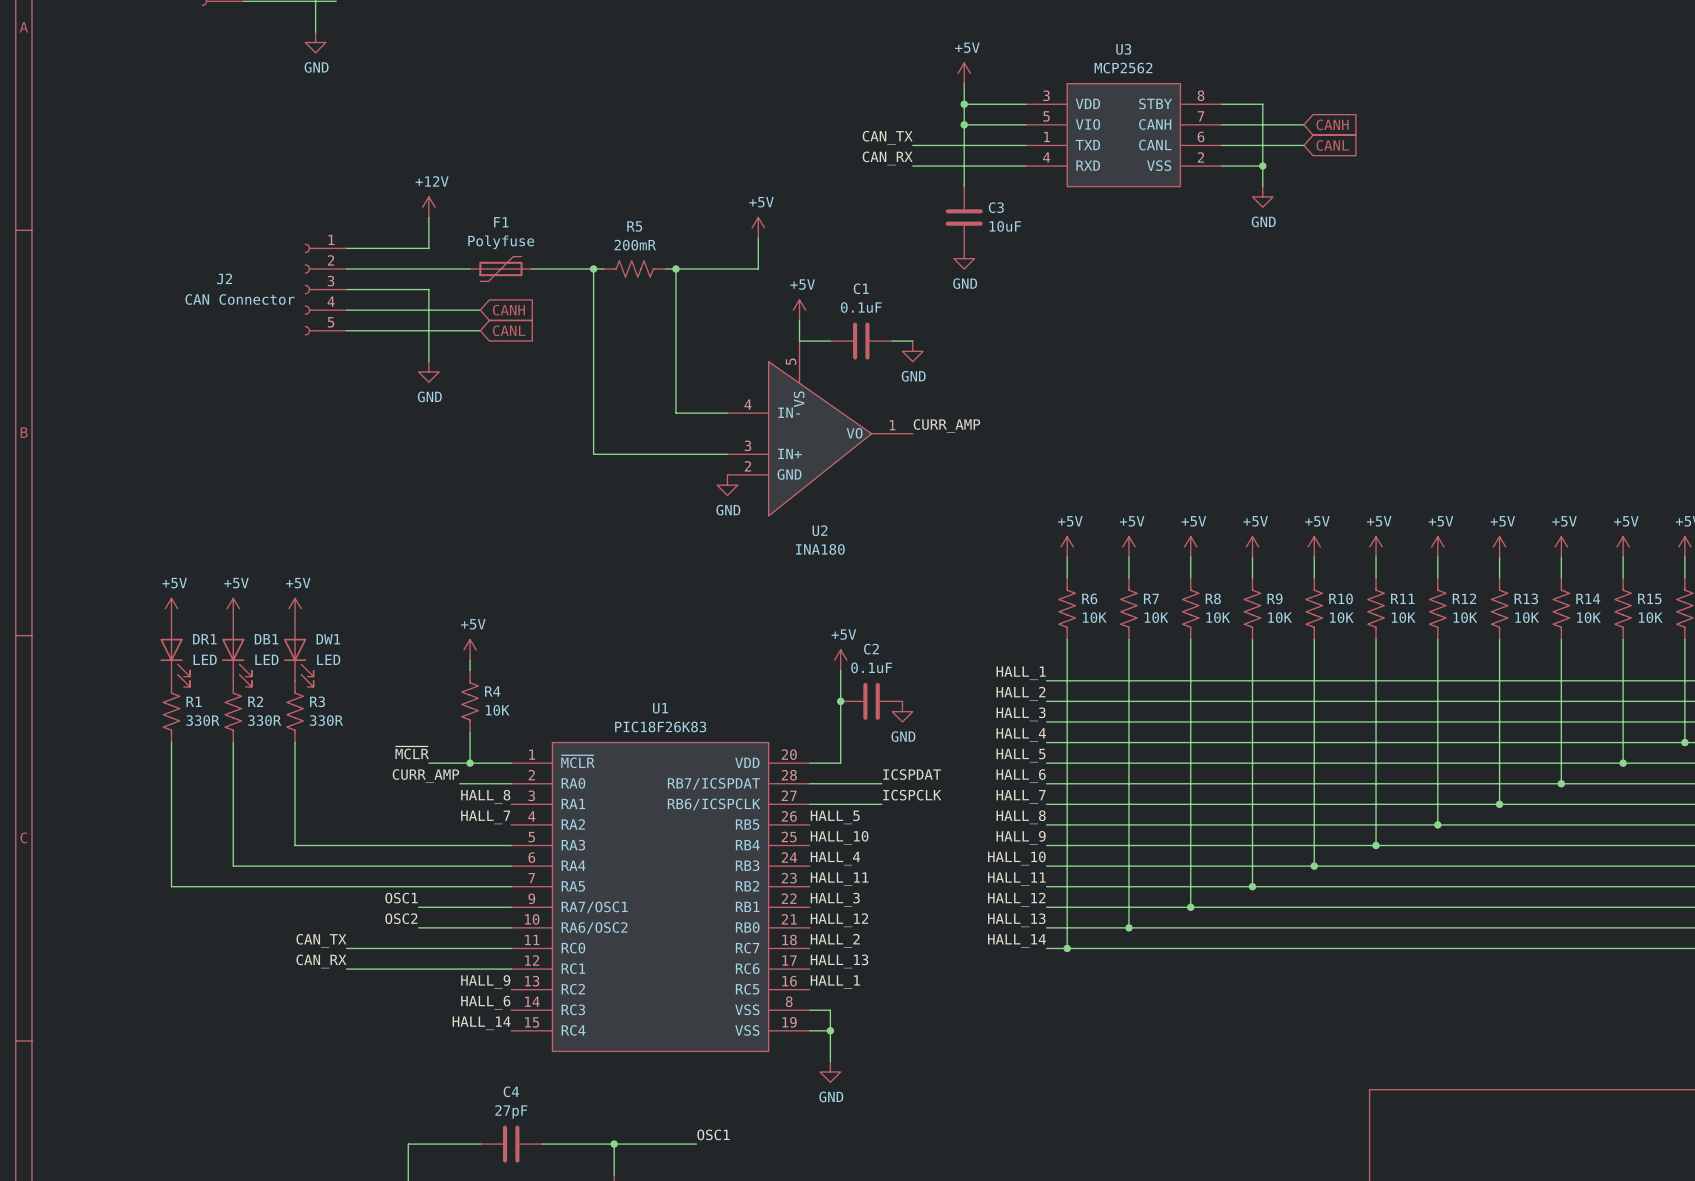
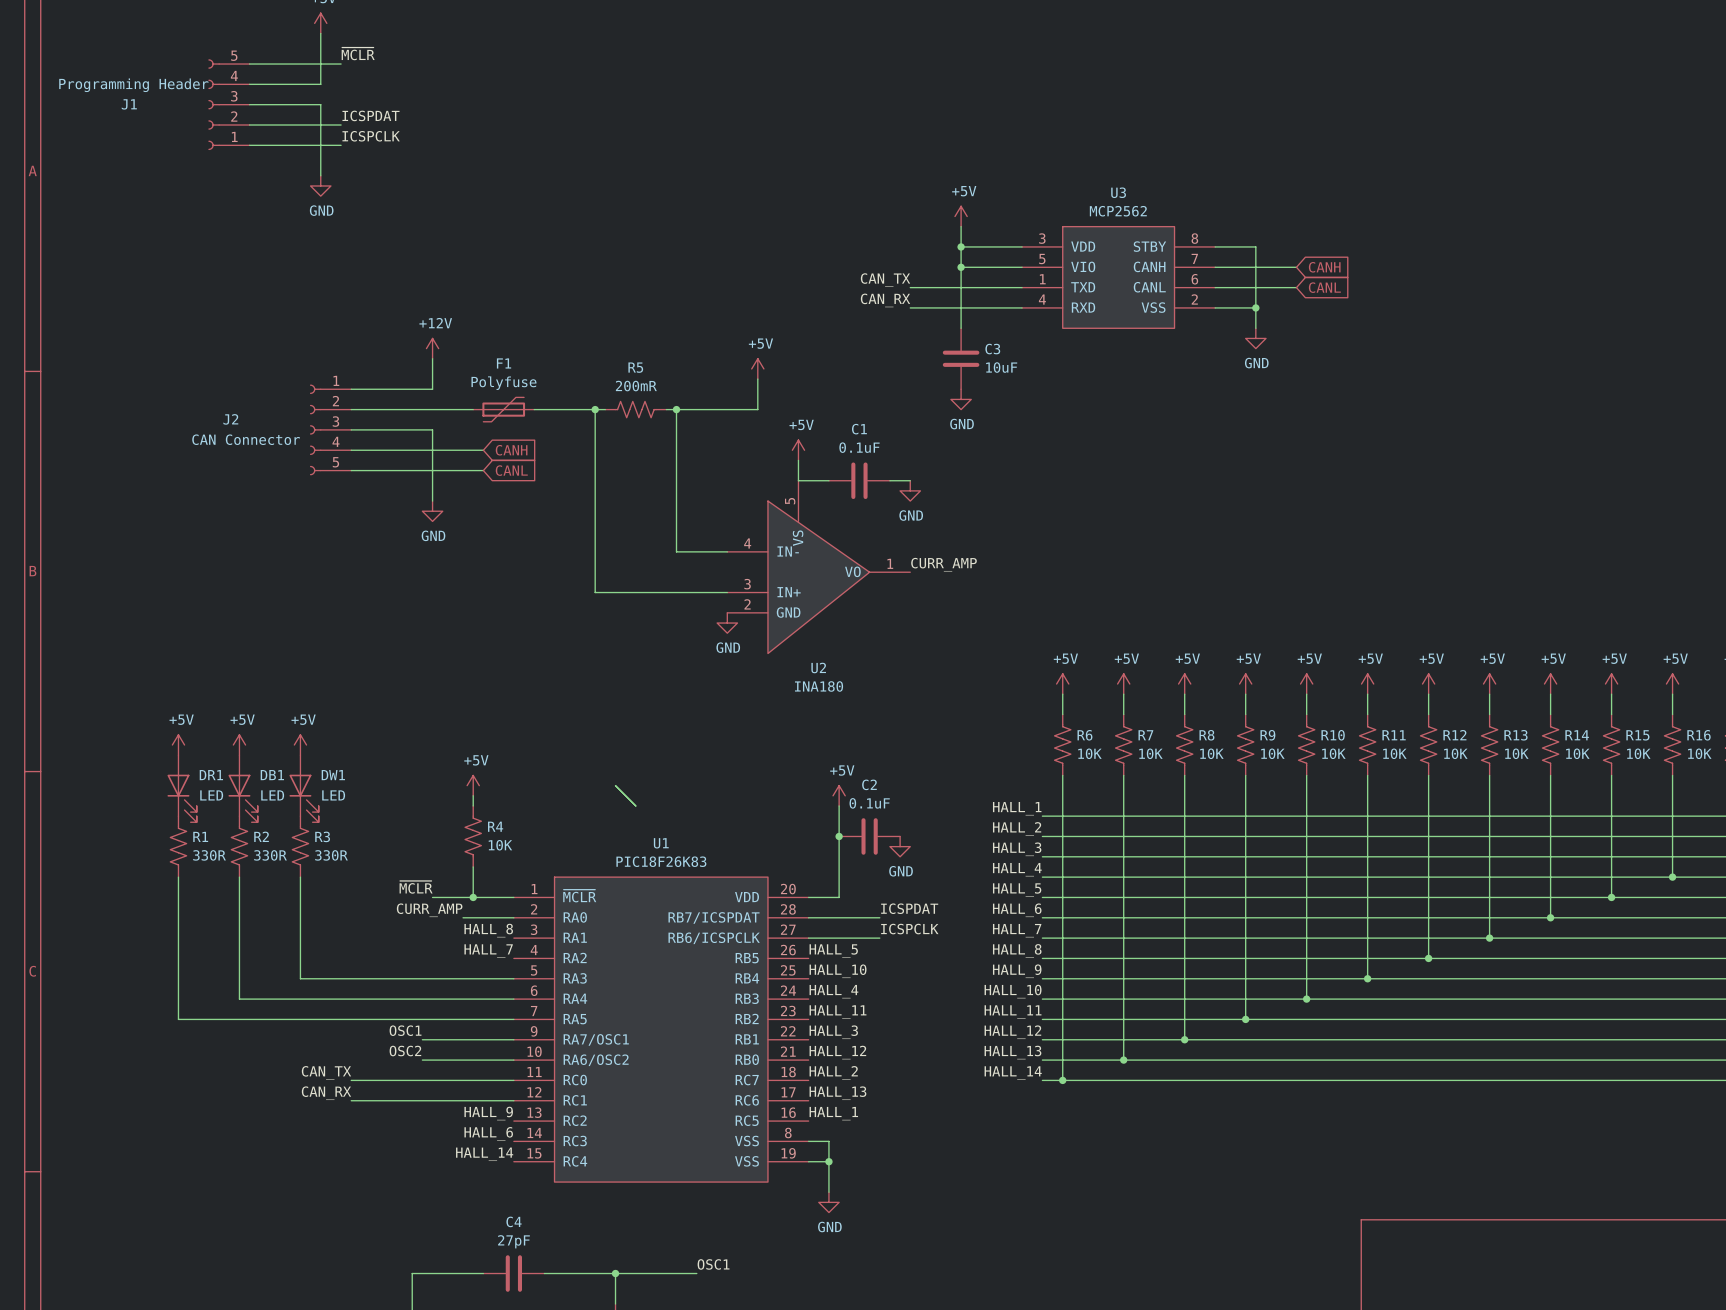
wire: none -> (615, 785) (635, 805)

